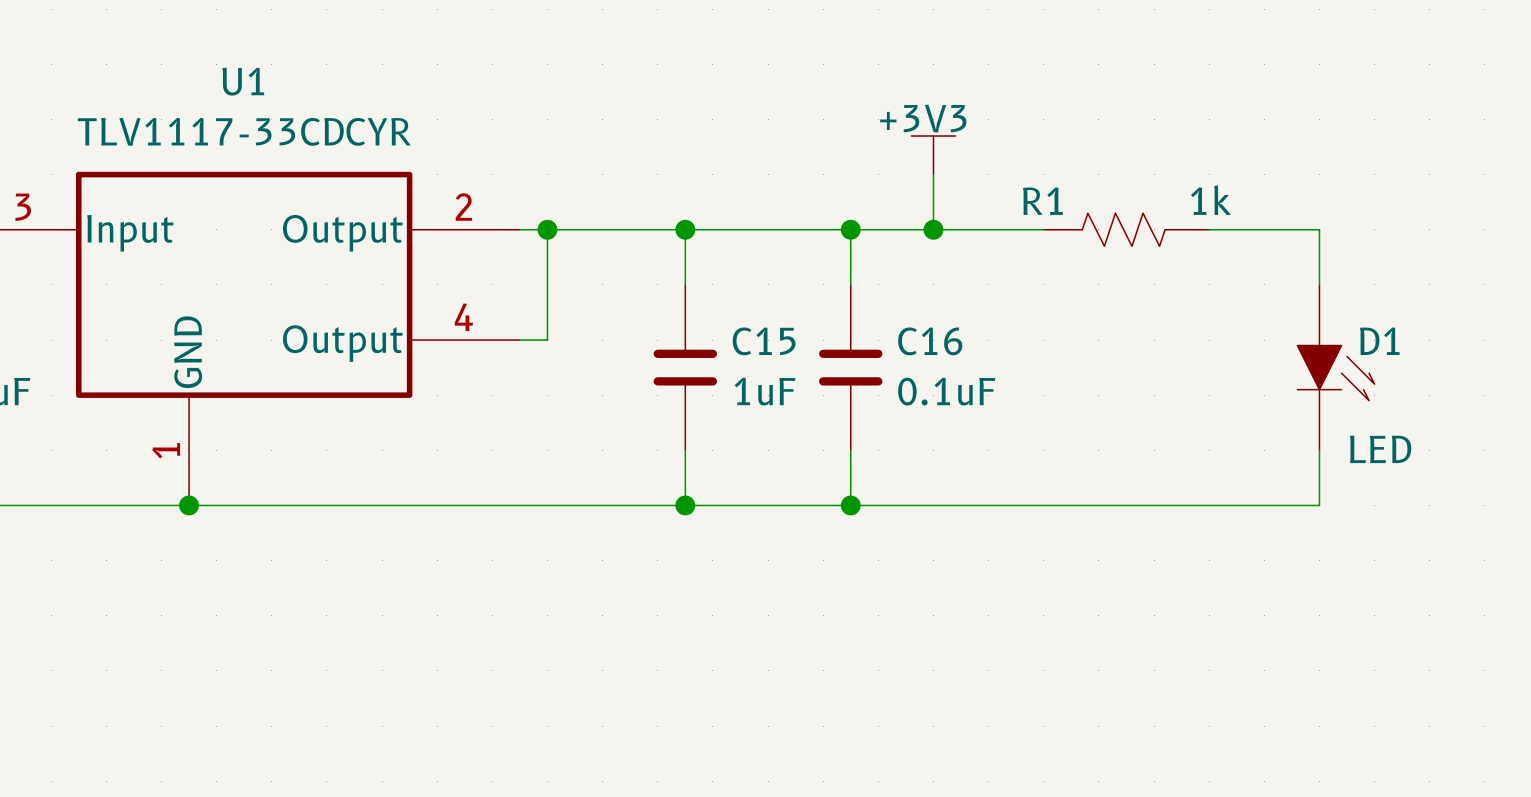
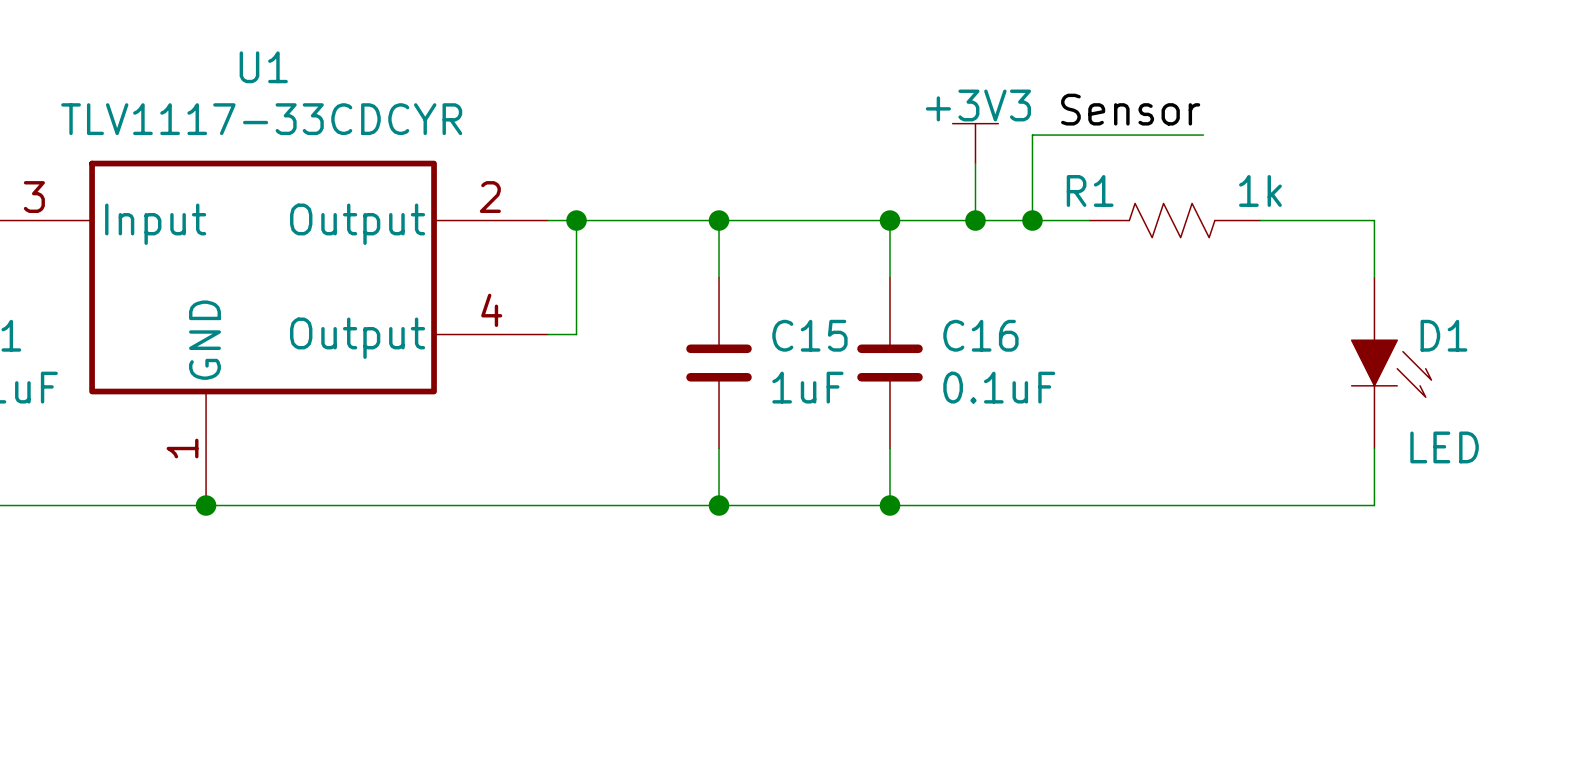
label: none -> Sensor (1130, 109)
wire: none -> (1203, 135) (1032, 135) (1032, 220)
junction: none -> (1032, 220)

